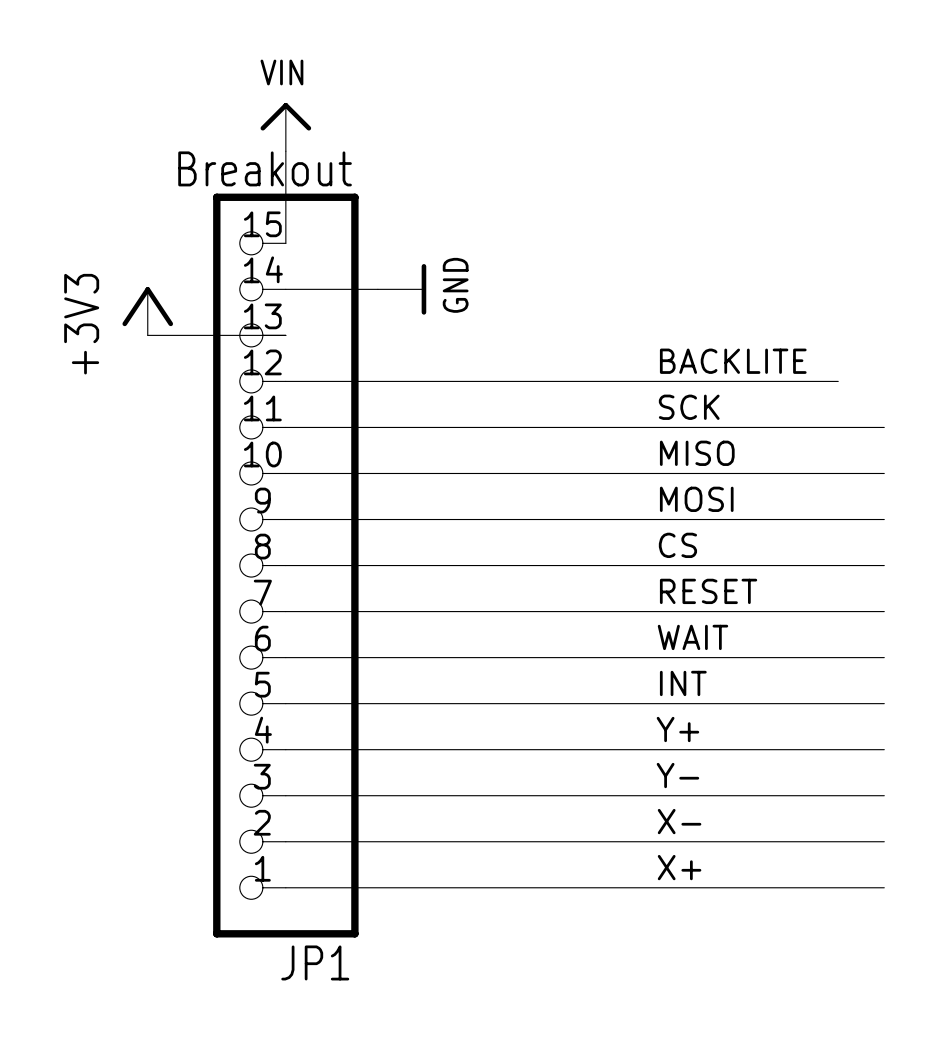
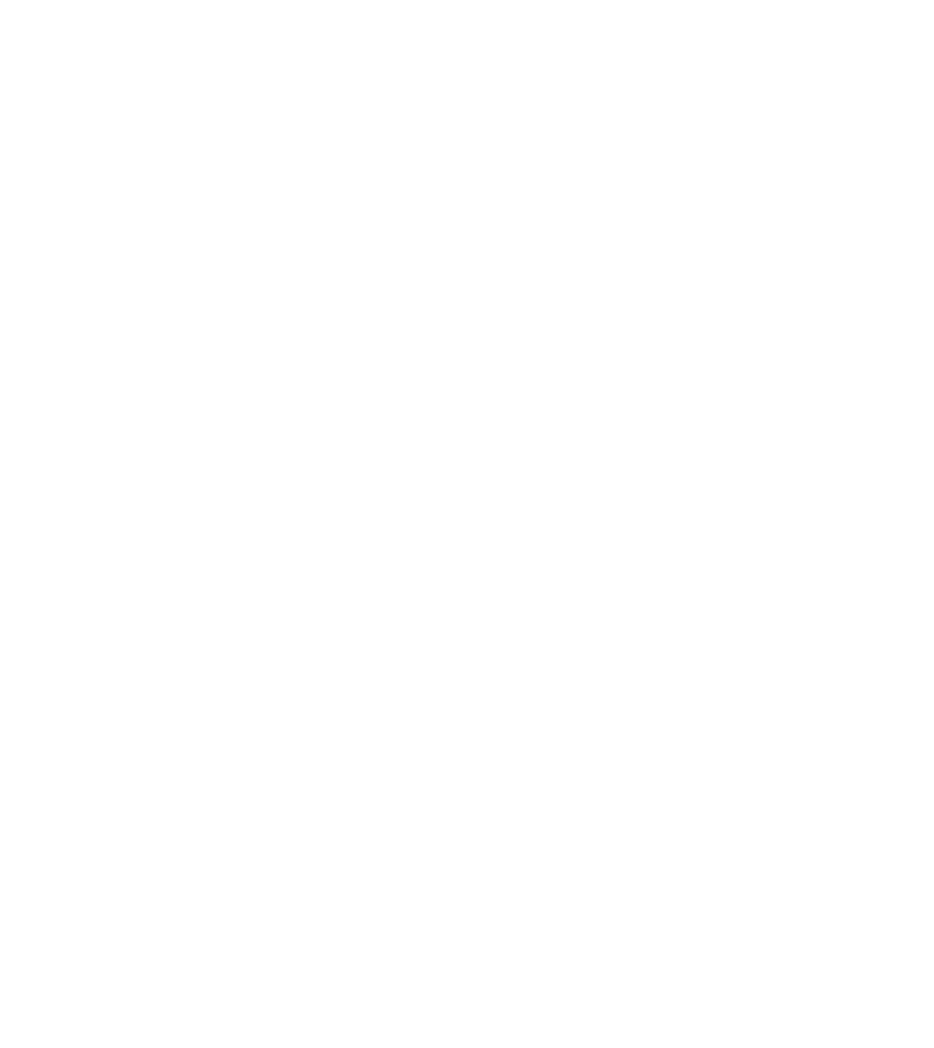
power symbol: VIN (285, 127) -> none
wire: (285, 151) (285, 243) -> none
wire: (285, 289) (377, 289) -> none
power symbol: GND (402, 289) -> none
power symbol: +3V3 (147, 311) -> none
wire: (147, 335) (285, 335) -> none
label: BACKLITE (733, 361) -> none
wire: (285, 381) (838, 381) -> none
label: SCK (689, 407) -> none
wire: (285, 427) (884, 427) -> none
label: MISO (697, 453) -> none
wire: (285, 473) (884, 473) -> none
label: MOSI (696, 499) -> none
wire: (285, 519) (884, 519) -> none
label: CS (677, 545) -> none
wire: (285, 565) (884, 565) -> none
JP1: Breakout (285, 565) -> none
label: RESET (708, 591) -> none
wire: (285, 611) (884, 611) -> none
label: WAIT (692, 637) -> none
wire: (285, 657) (884, 657) -> none
label: INT (683, 683) -> none
wire: (285, 703) (884, 703) -> none
label: Y+ (677, 729) -> none
wire: (285, 749) (884, 749) -> none
label: Y- (677, 775) -> none
wire: (285, 795) (884, 795) -> none
label: X- (679, 821) -> none
wire: (285, 841) (884, 841) -> none
label: X+ (679, 867) -> none
wire: (285, 887) (884, 887) -> none

